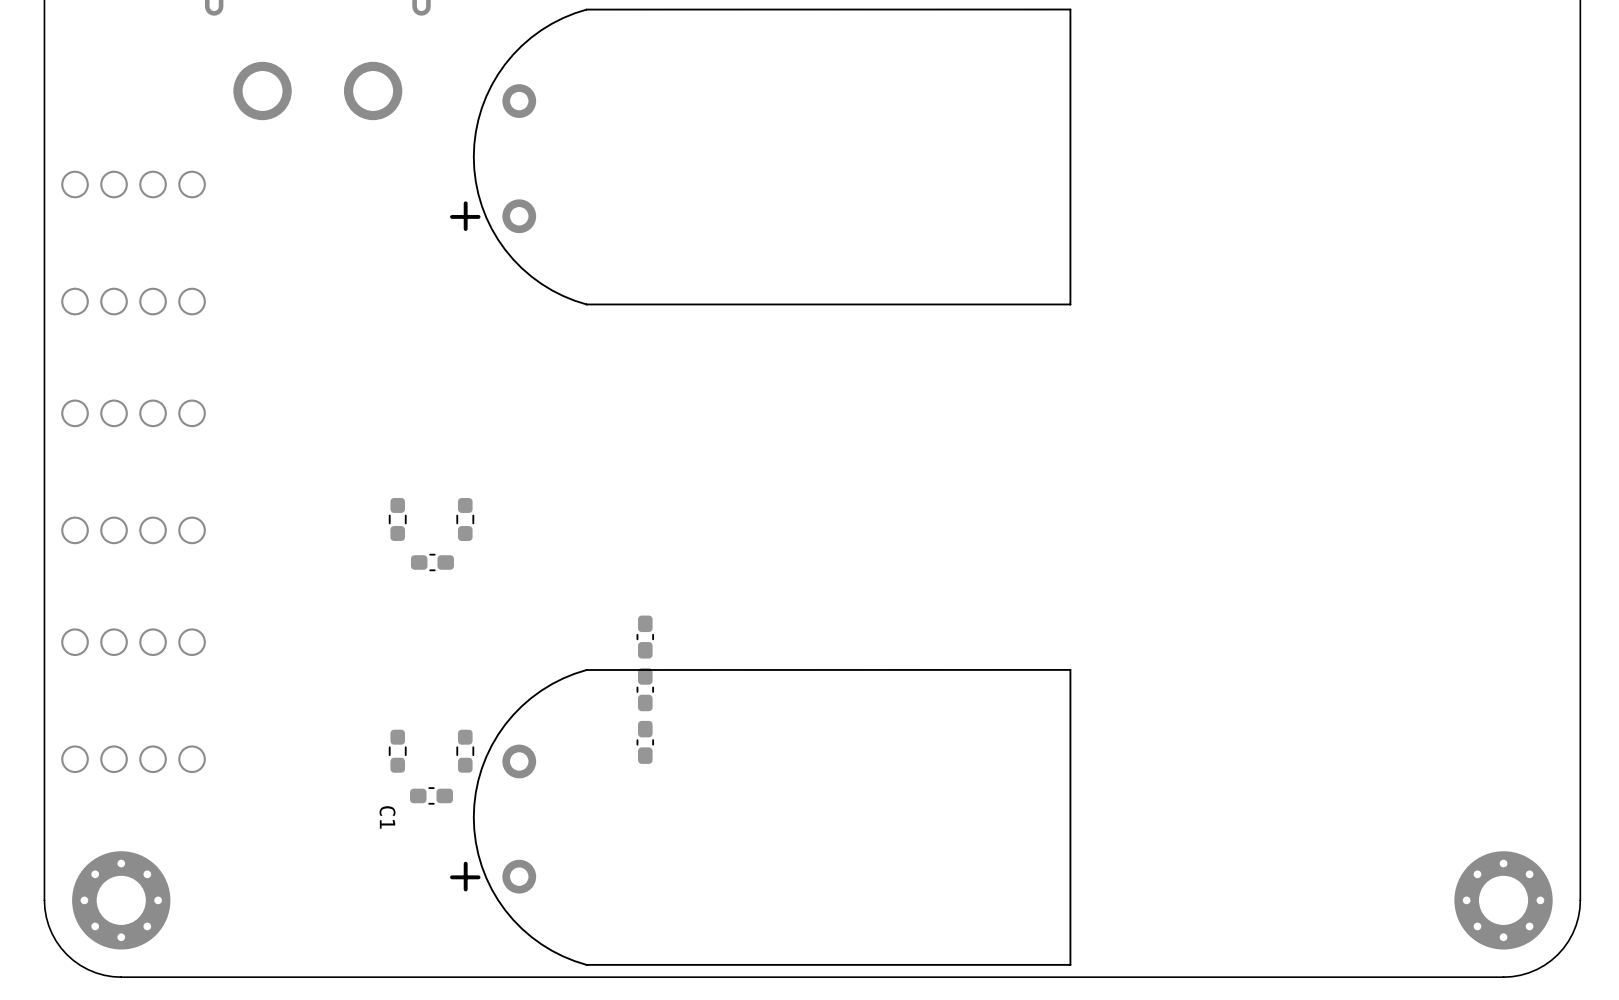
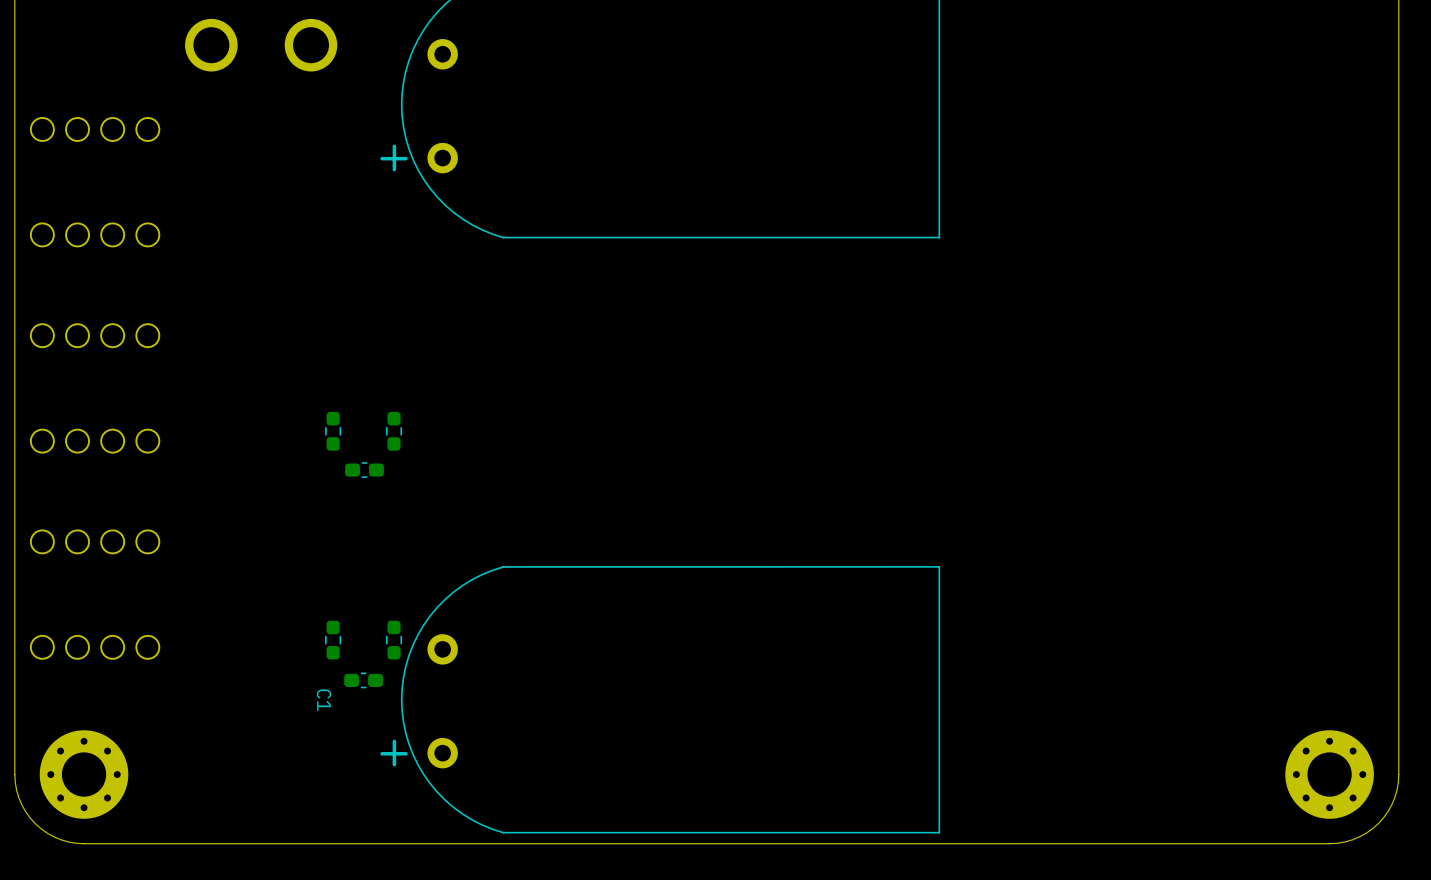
part: (645, 637) -> none
part: (645, 689) -> none
part: (645, 742) -> none

